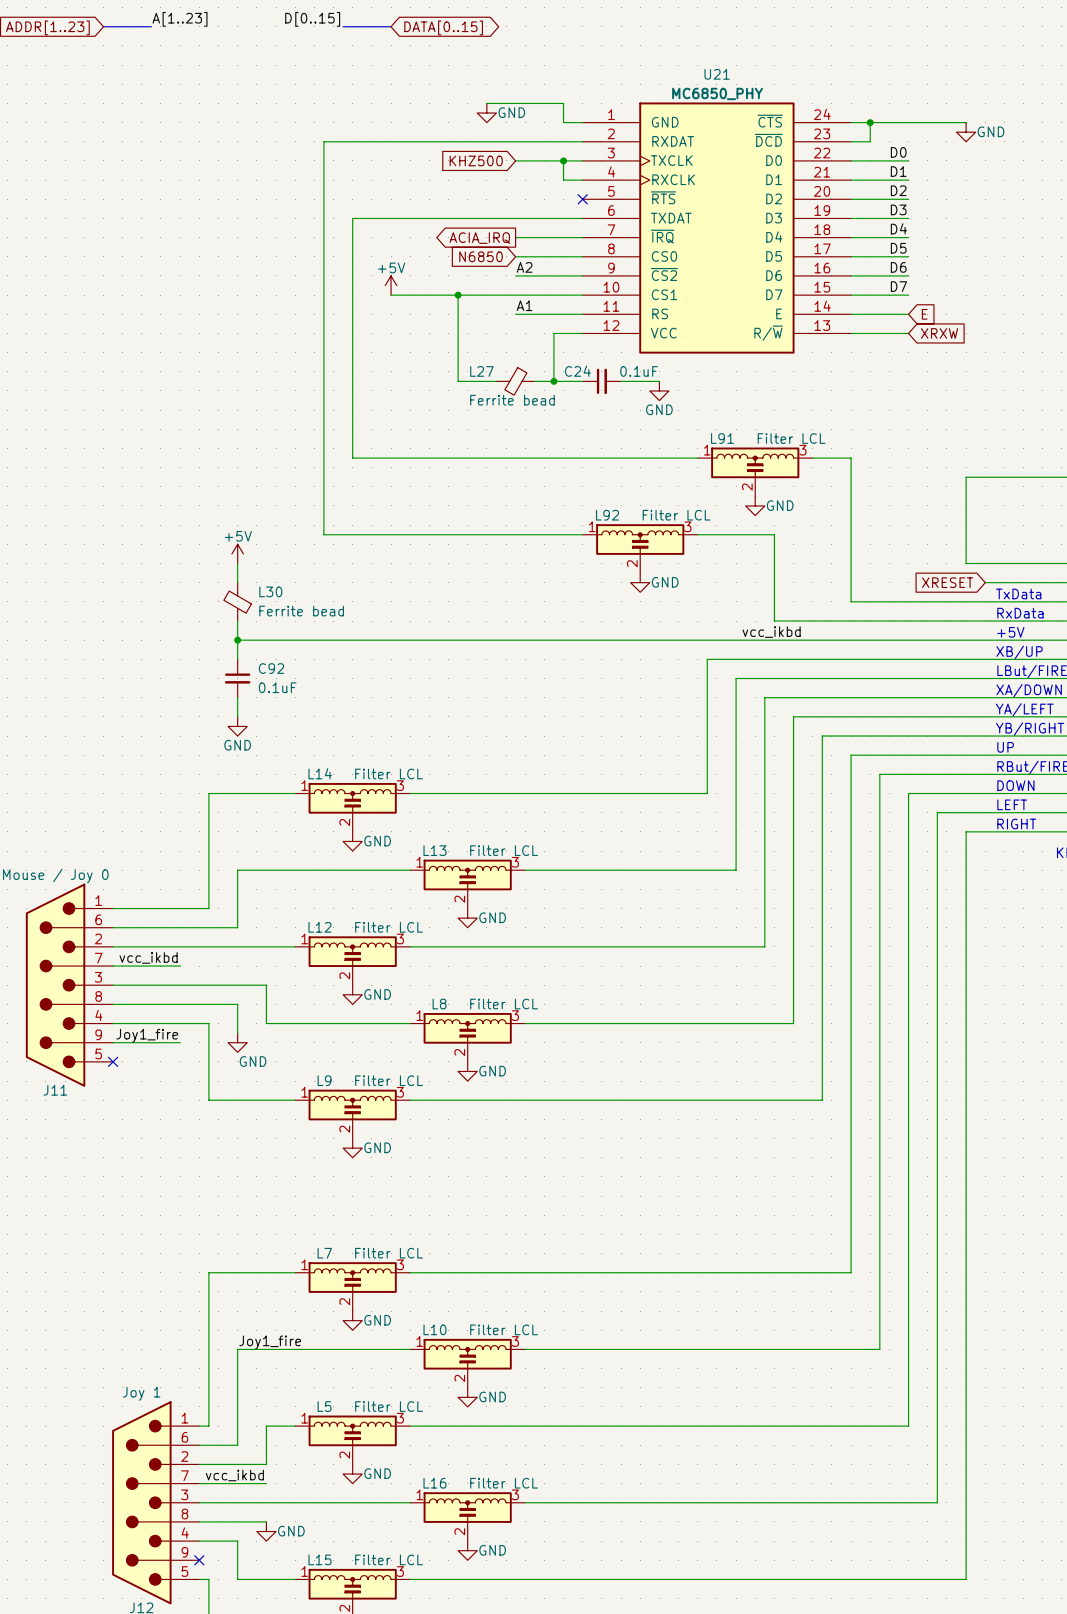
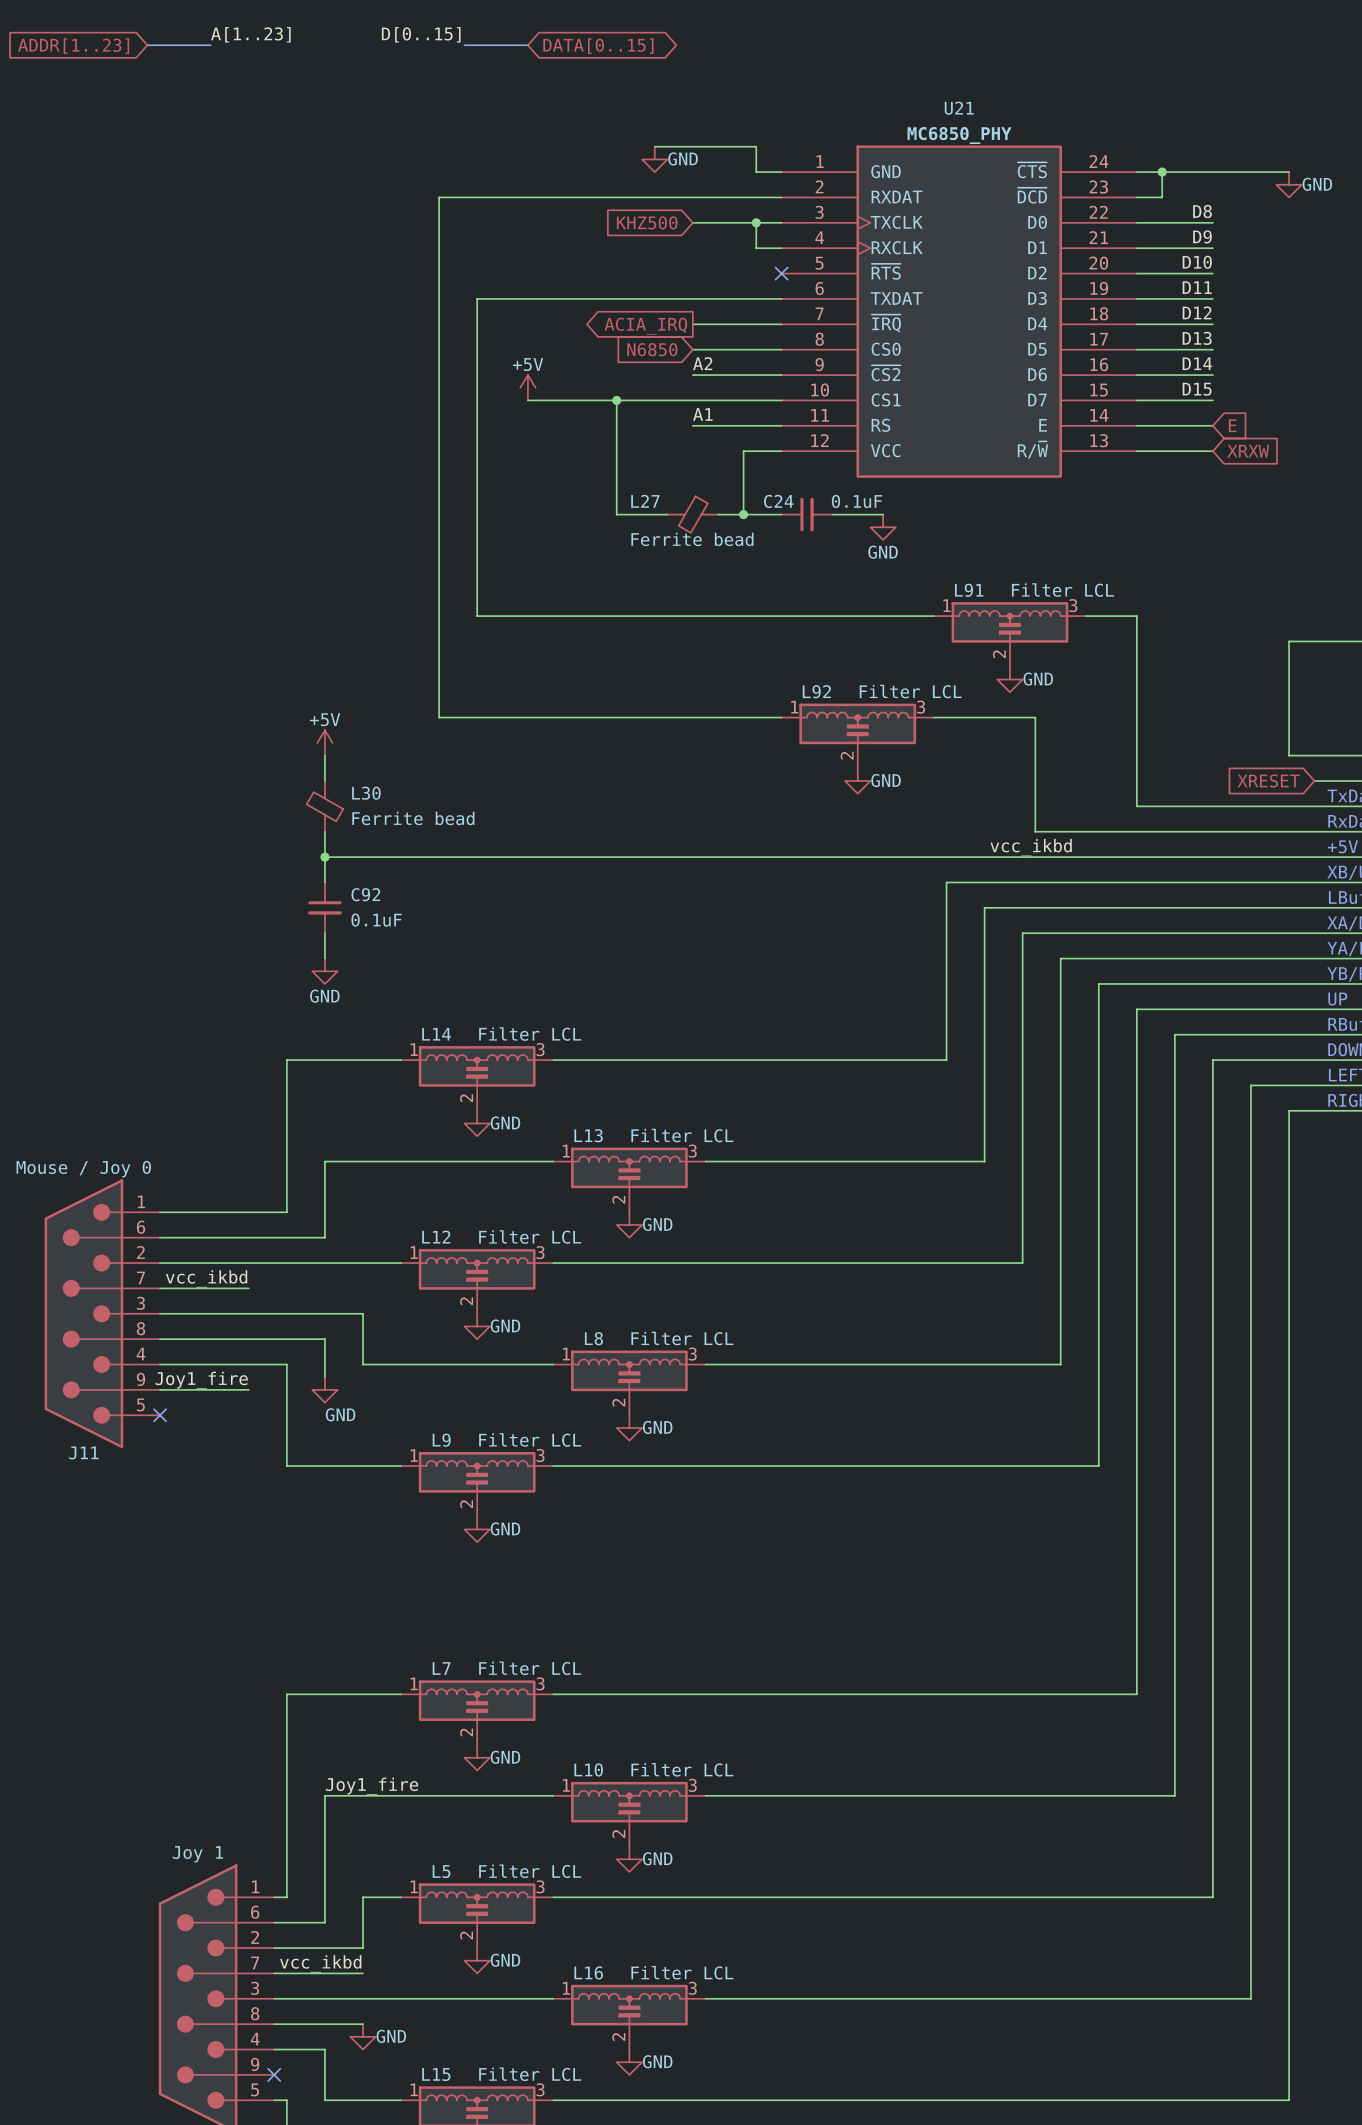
label: D0 (898, 152) -> D8 (1202, 211)
label: D1 (898, 171) -> D9 (1202, 236)
label: D2 (898, 190) -> D10 (1197, 262)
label: D3 (898, 209) -> D11 (1197, 287)
label: D4 (898, 228) -> D12 (1197, 312)
label: D5 (898, 248) -> D13 (1197, 338)
label: D6 (898, 267) -> D14 (1197, 363)
label: D7 (898, 286) -> D15 (1197, 389)

